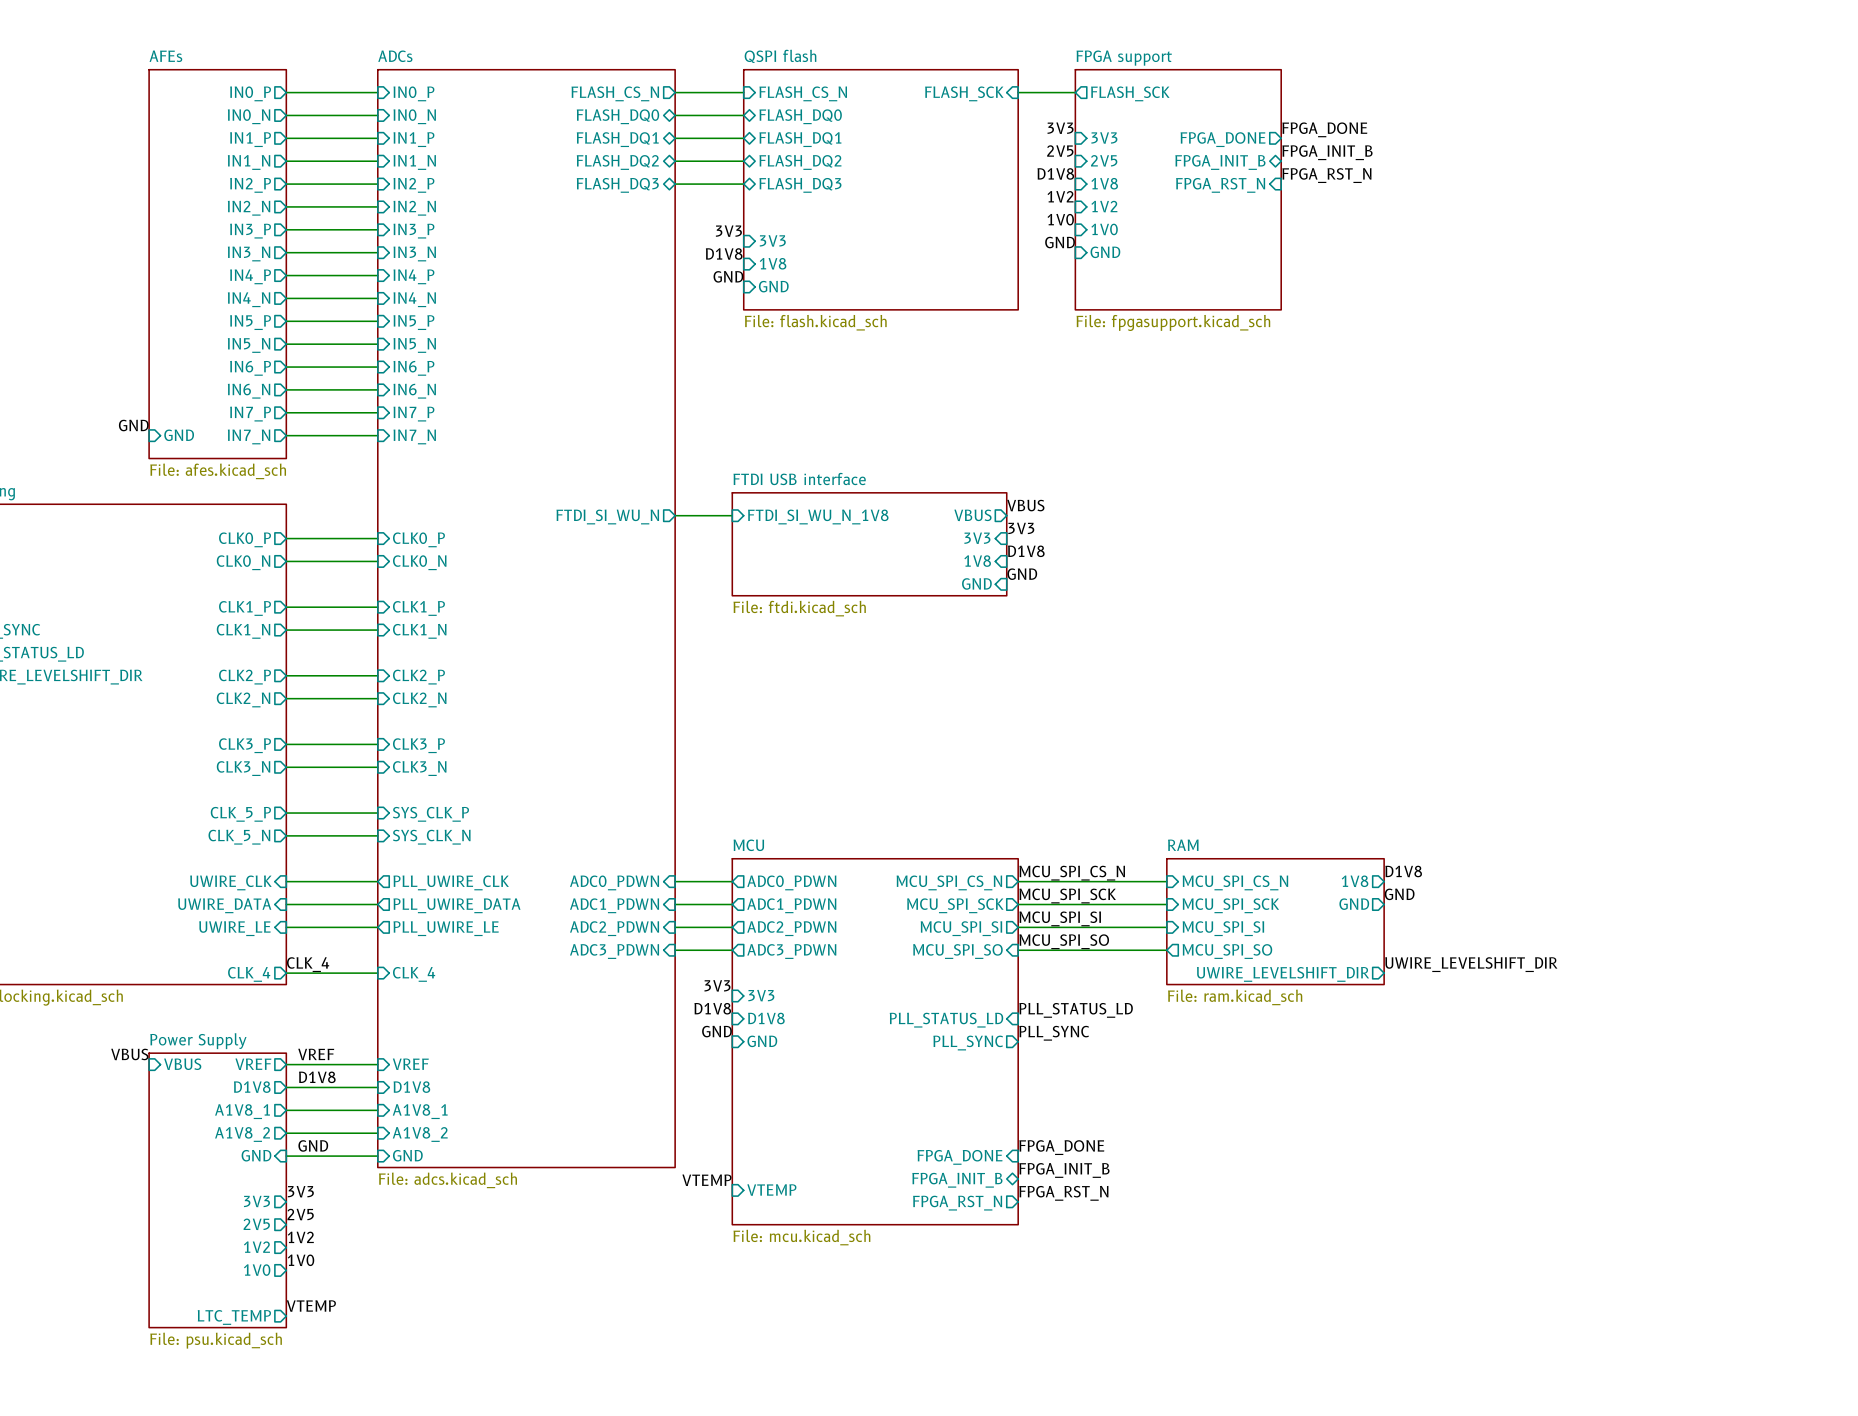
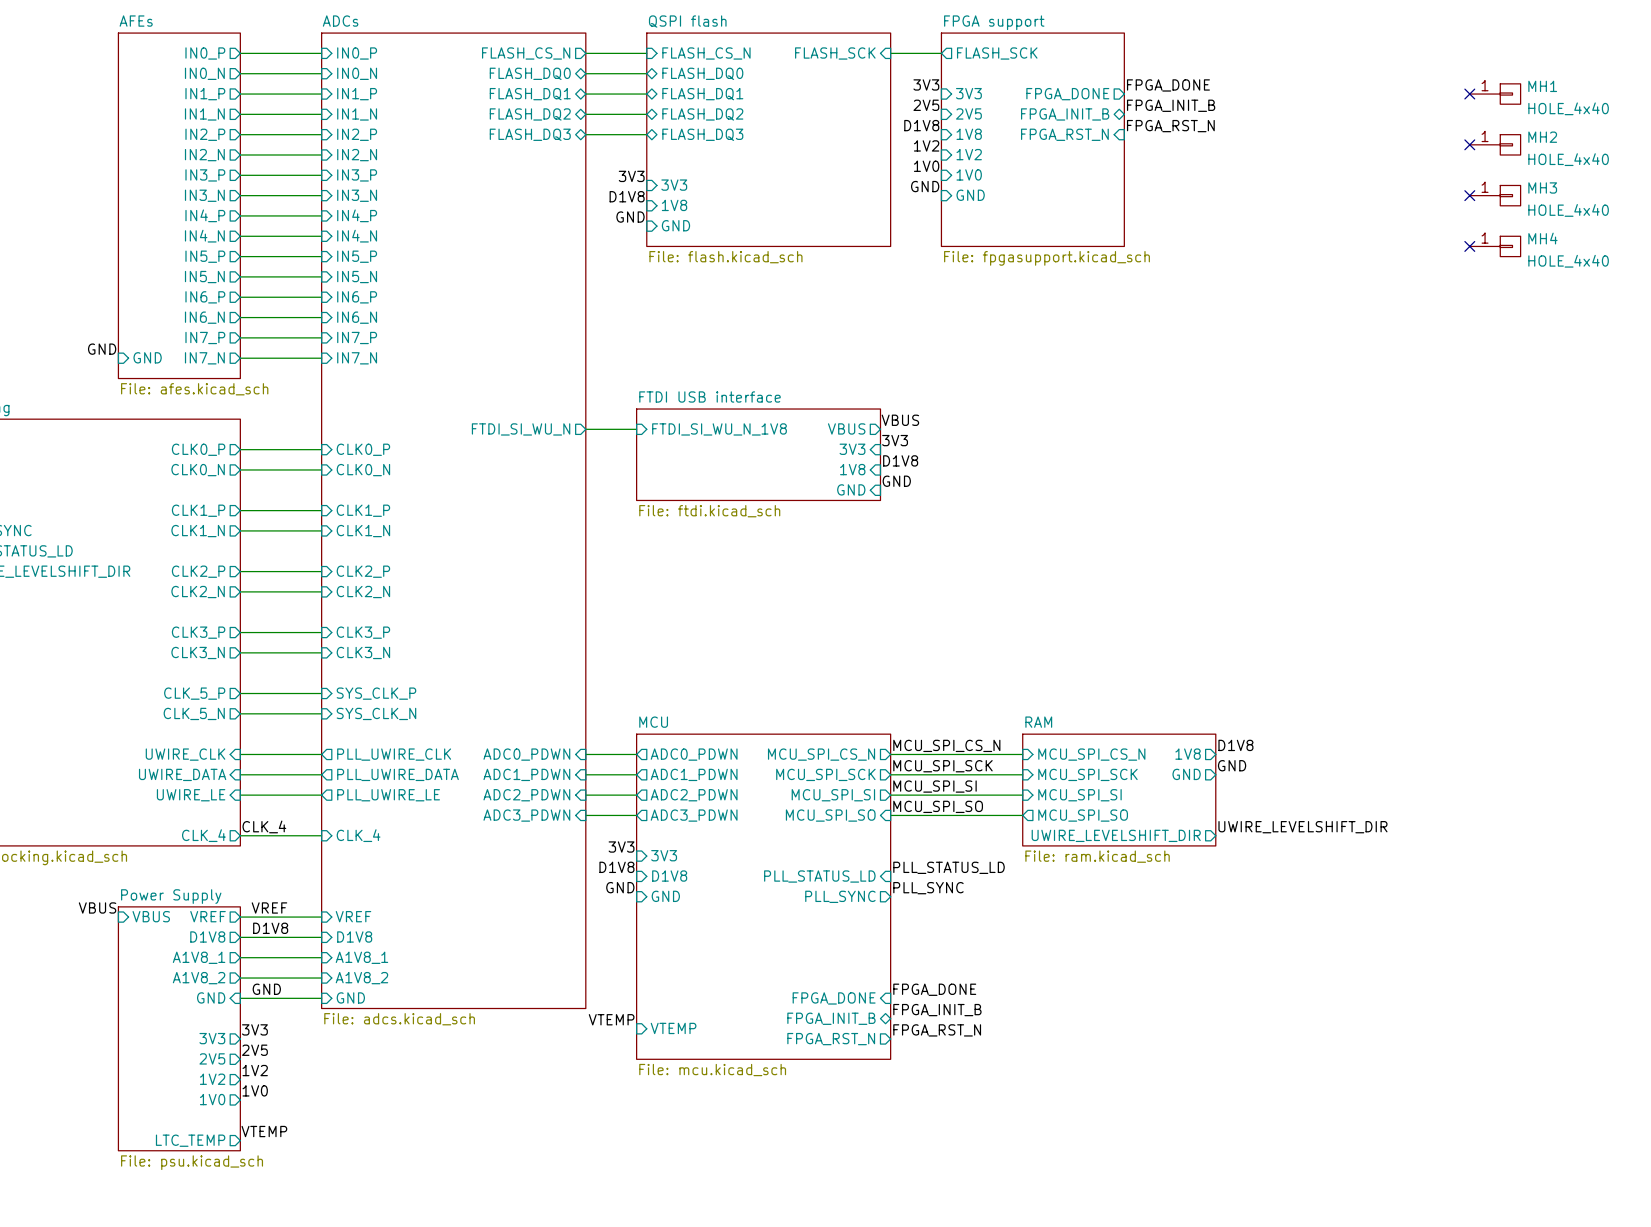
no-connect mark: none -> (1469, 94)
MH1: none -> HOLE_4x40 (1495, 94)
no-connect mark: none -> (1469, 144)
MH2: none -> HOLE_4x40 (1495, 144)
no-connect mark: none -> (1469, 195)
MH3: none -> HOLE_4x40 (1495, 195)
no-connect mark: none -> (1469, 246)
MH4: none -> HOLE_4x40 (1495, 246)

